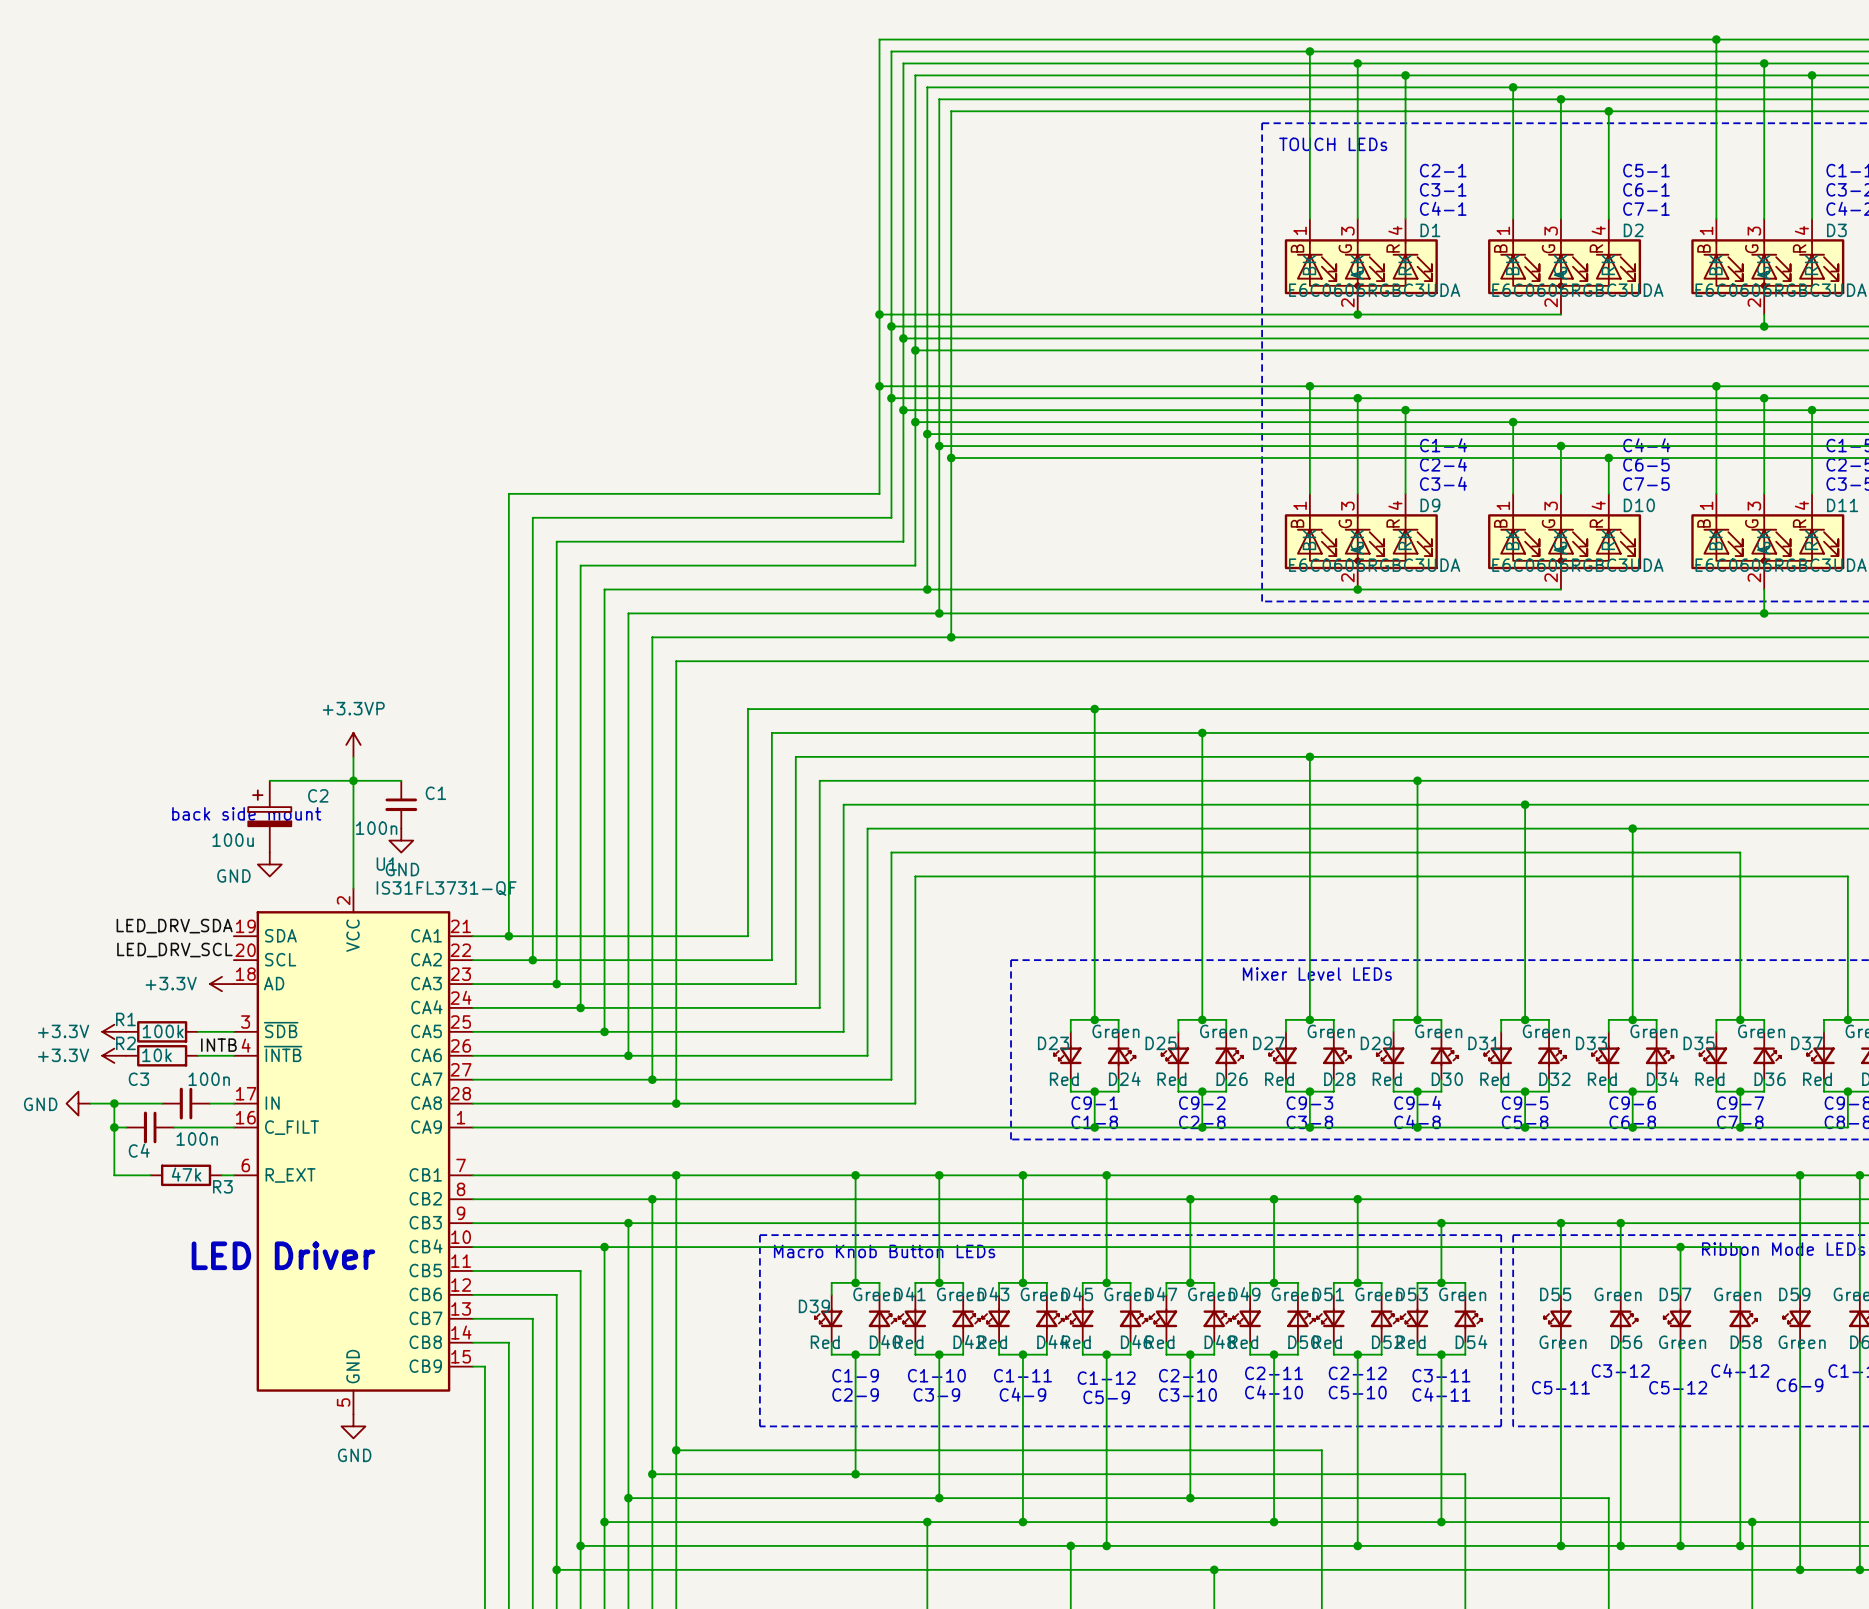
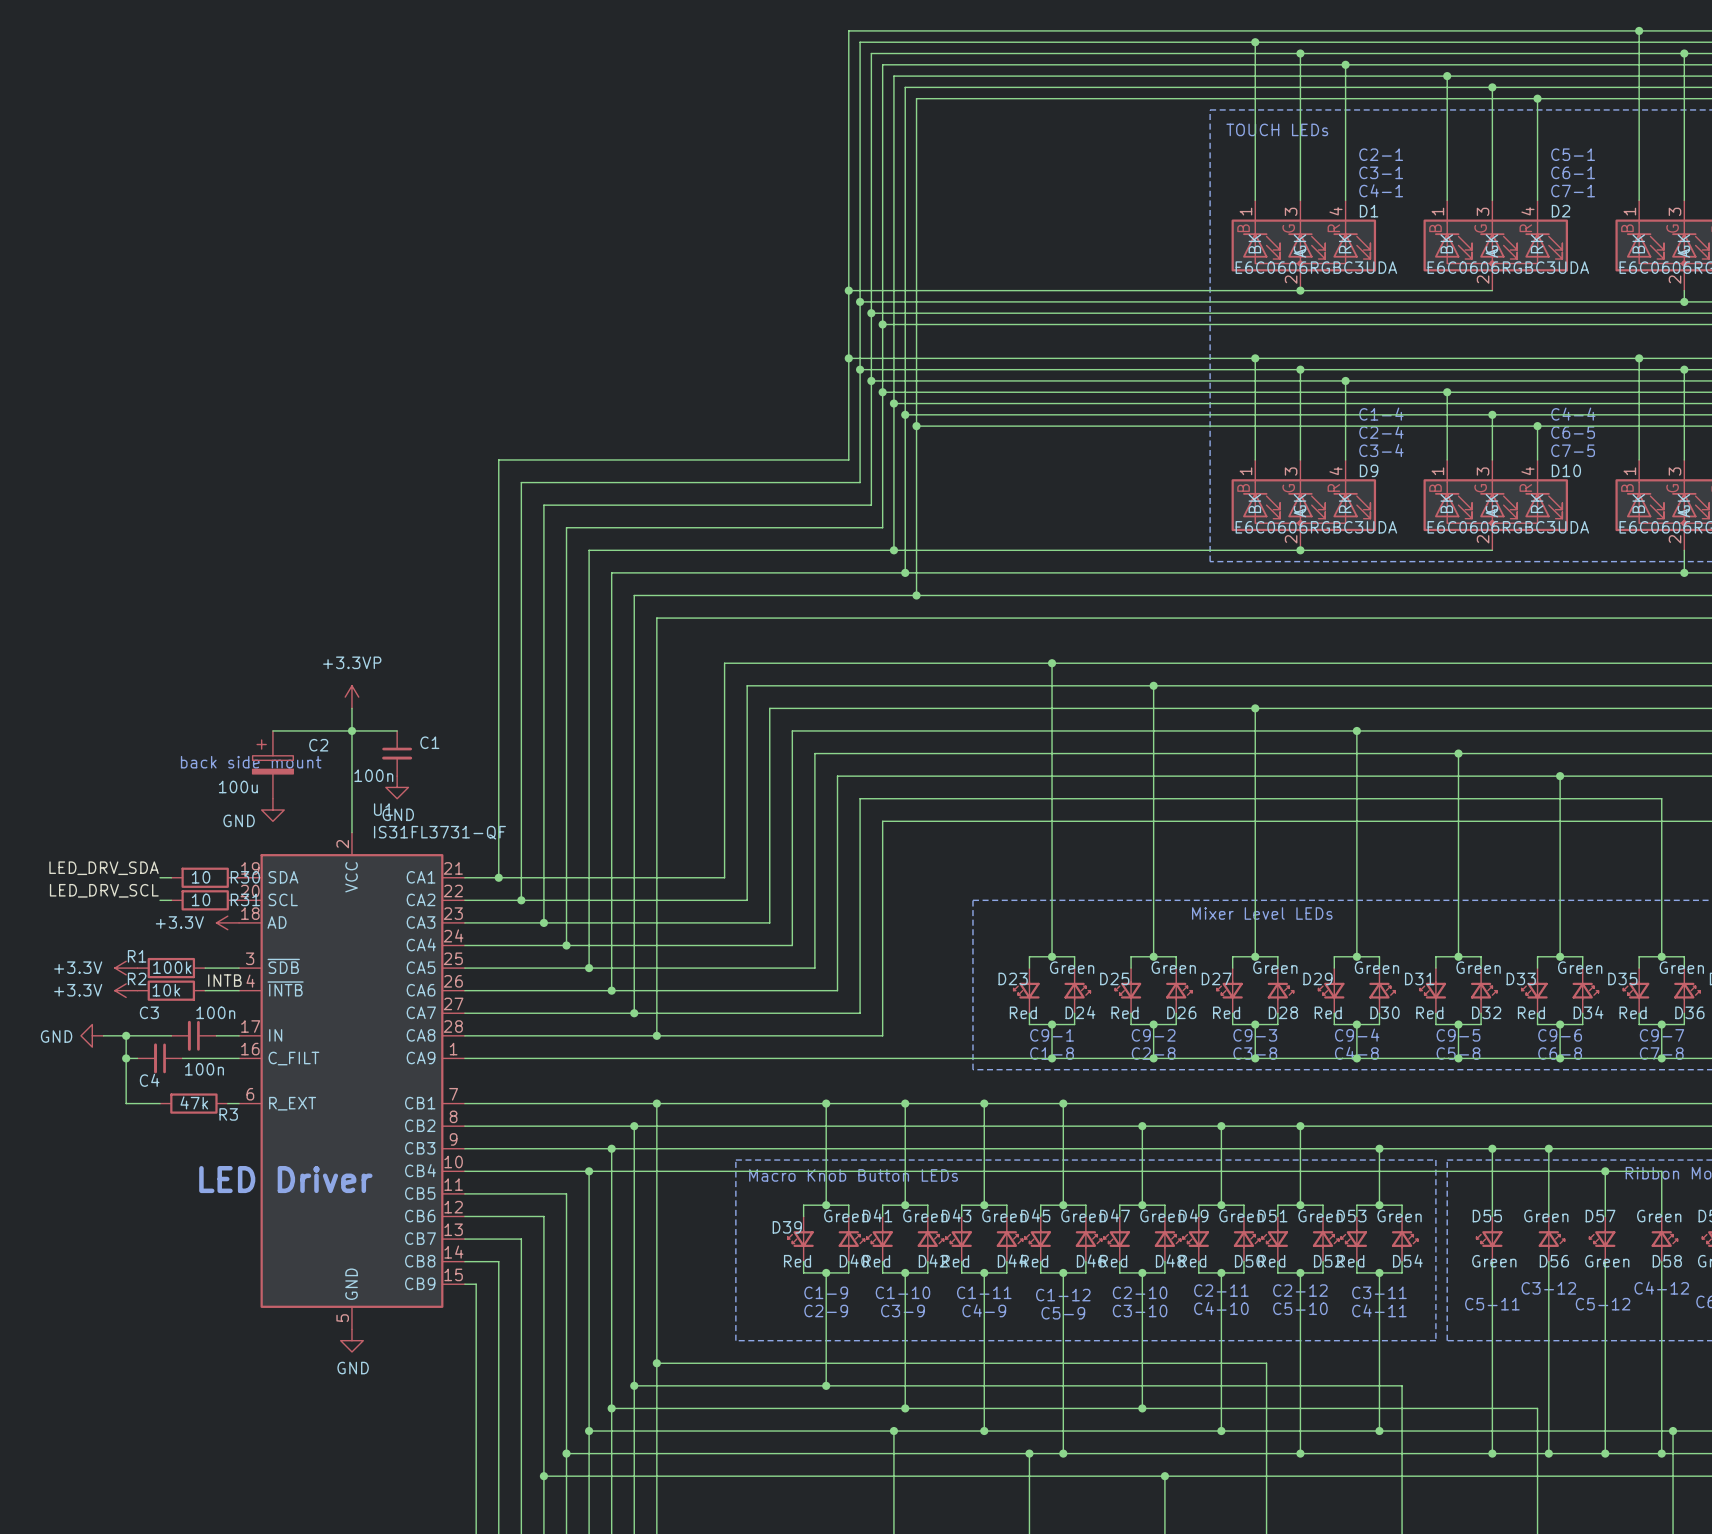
label position: LED_DRV_SDA (174, 926) -> LED_DRV_SDA (104, 868)
wire: none -> (160, 877) (171, 877)
R30: none -> 10 (205, 877)
label position: LED_DRV_SCL (174, 950) -> LED_DRV_SCL (104, 890)
wire: none -> (160, 900) (171, 900)
R31: none -> 10 (205, 900)

